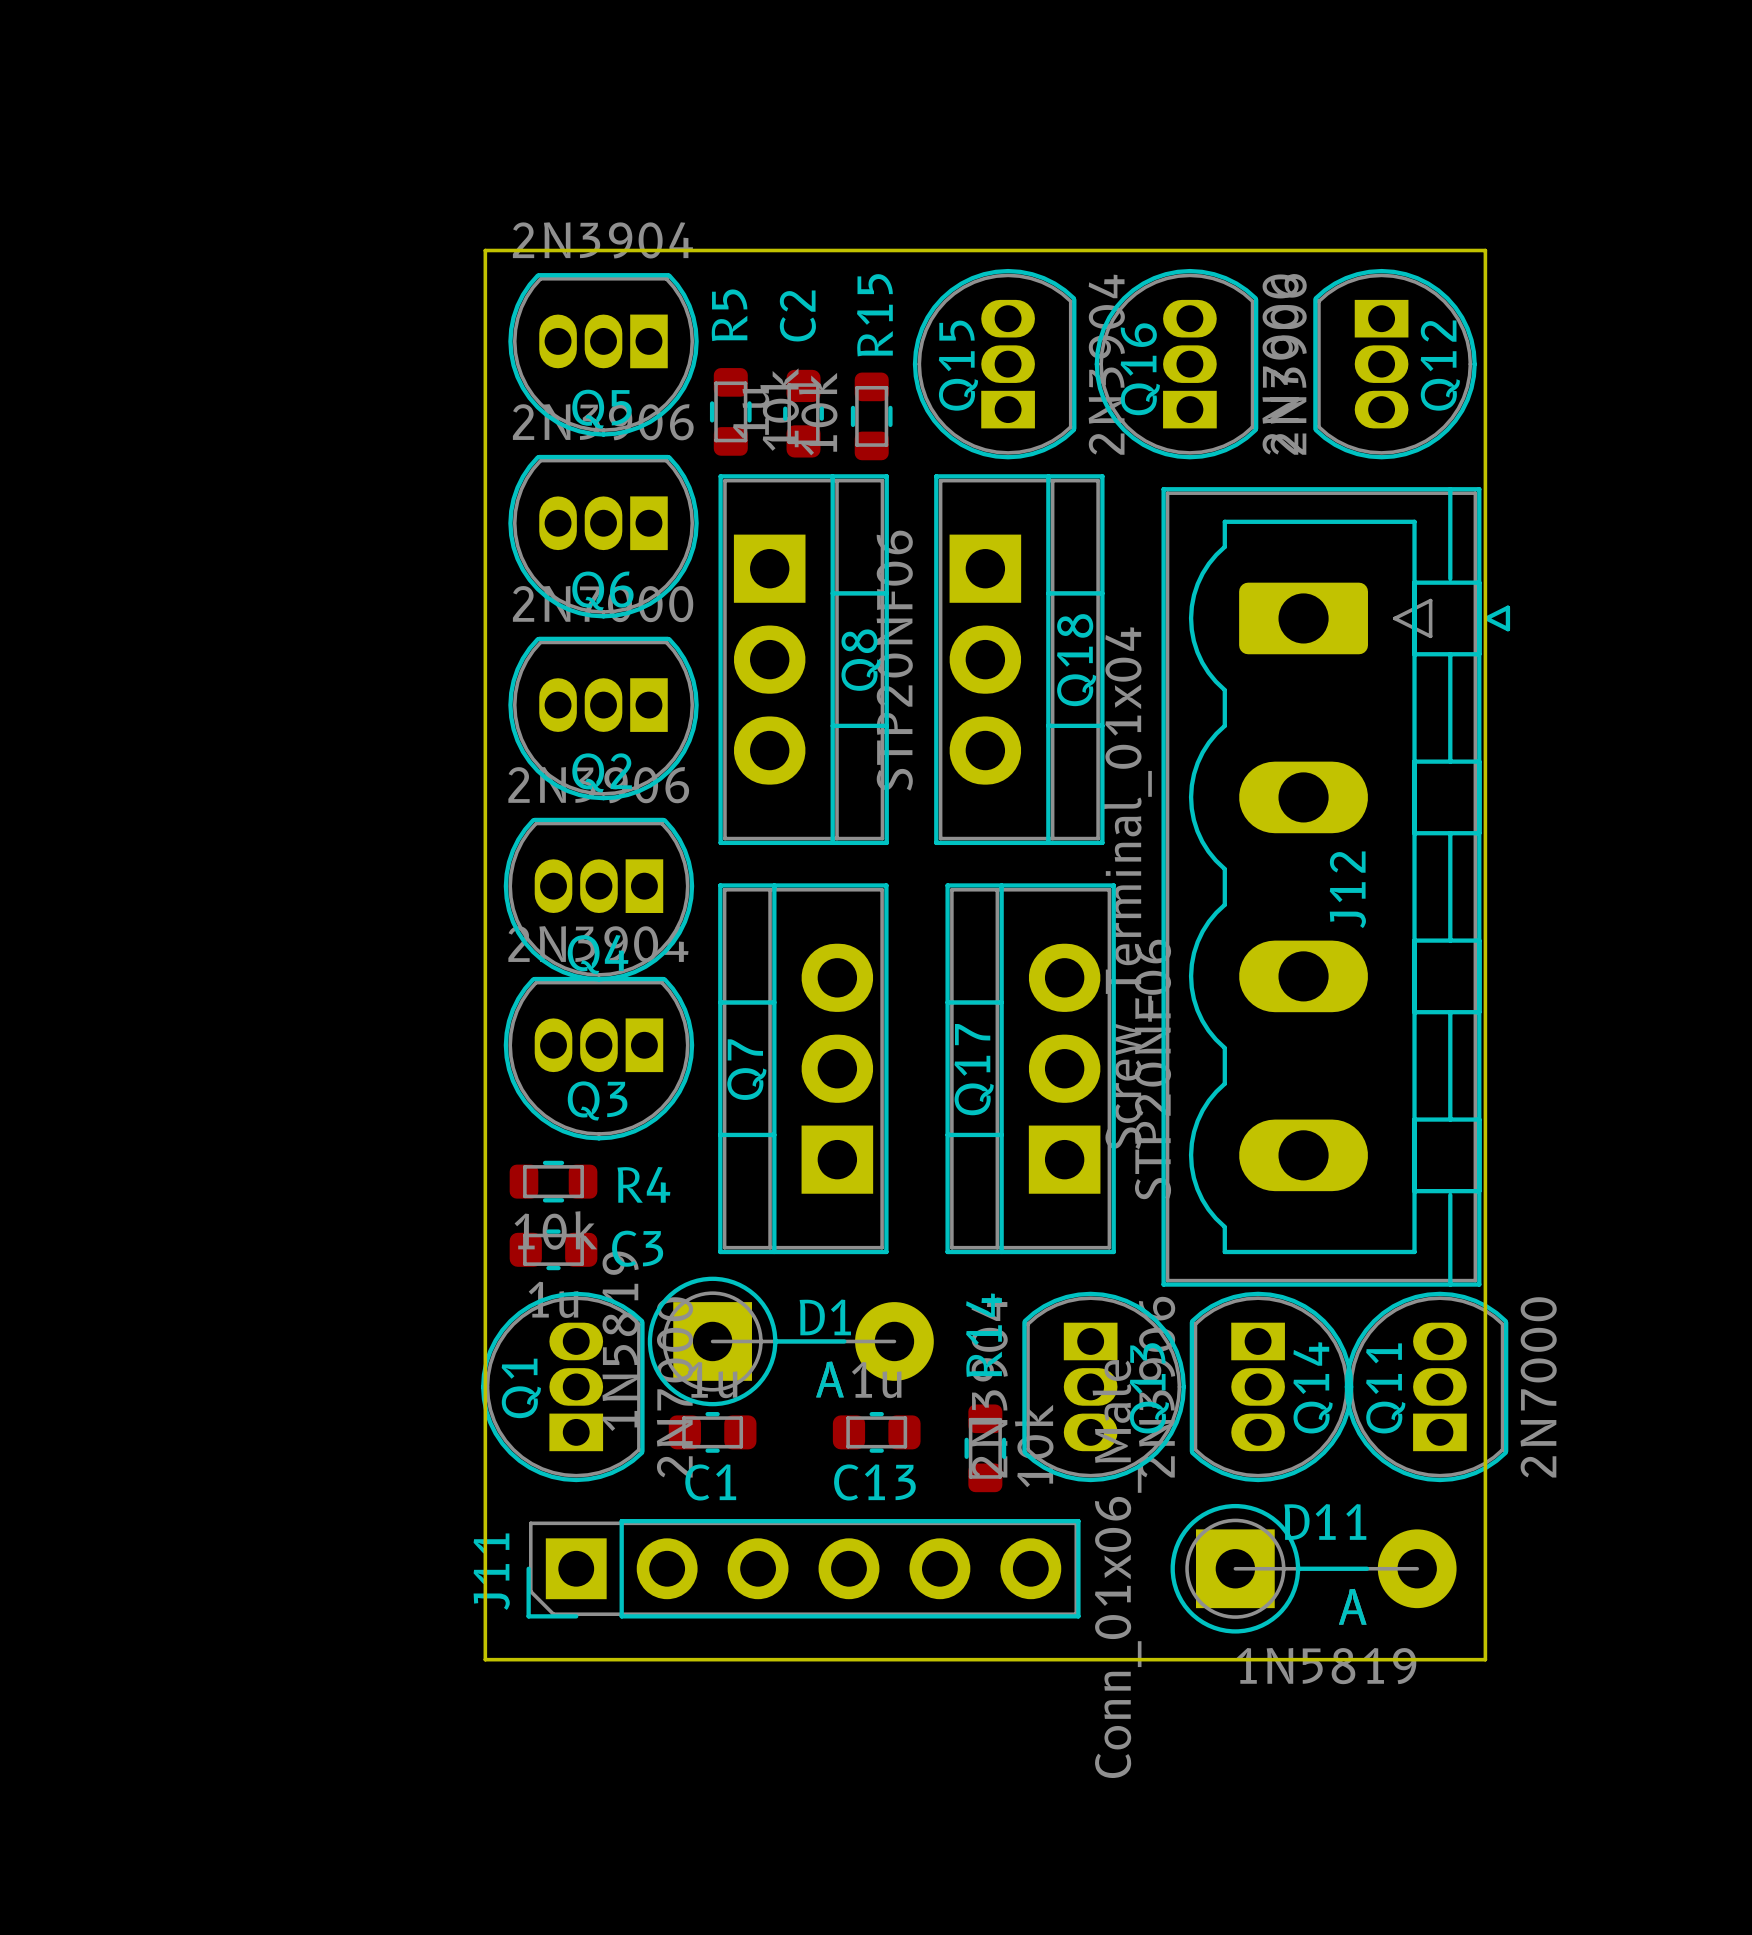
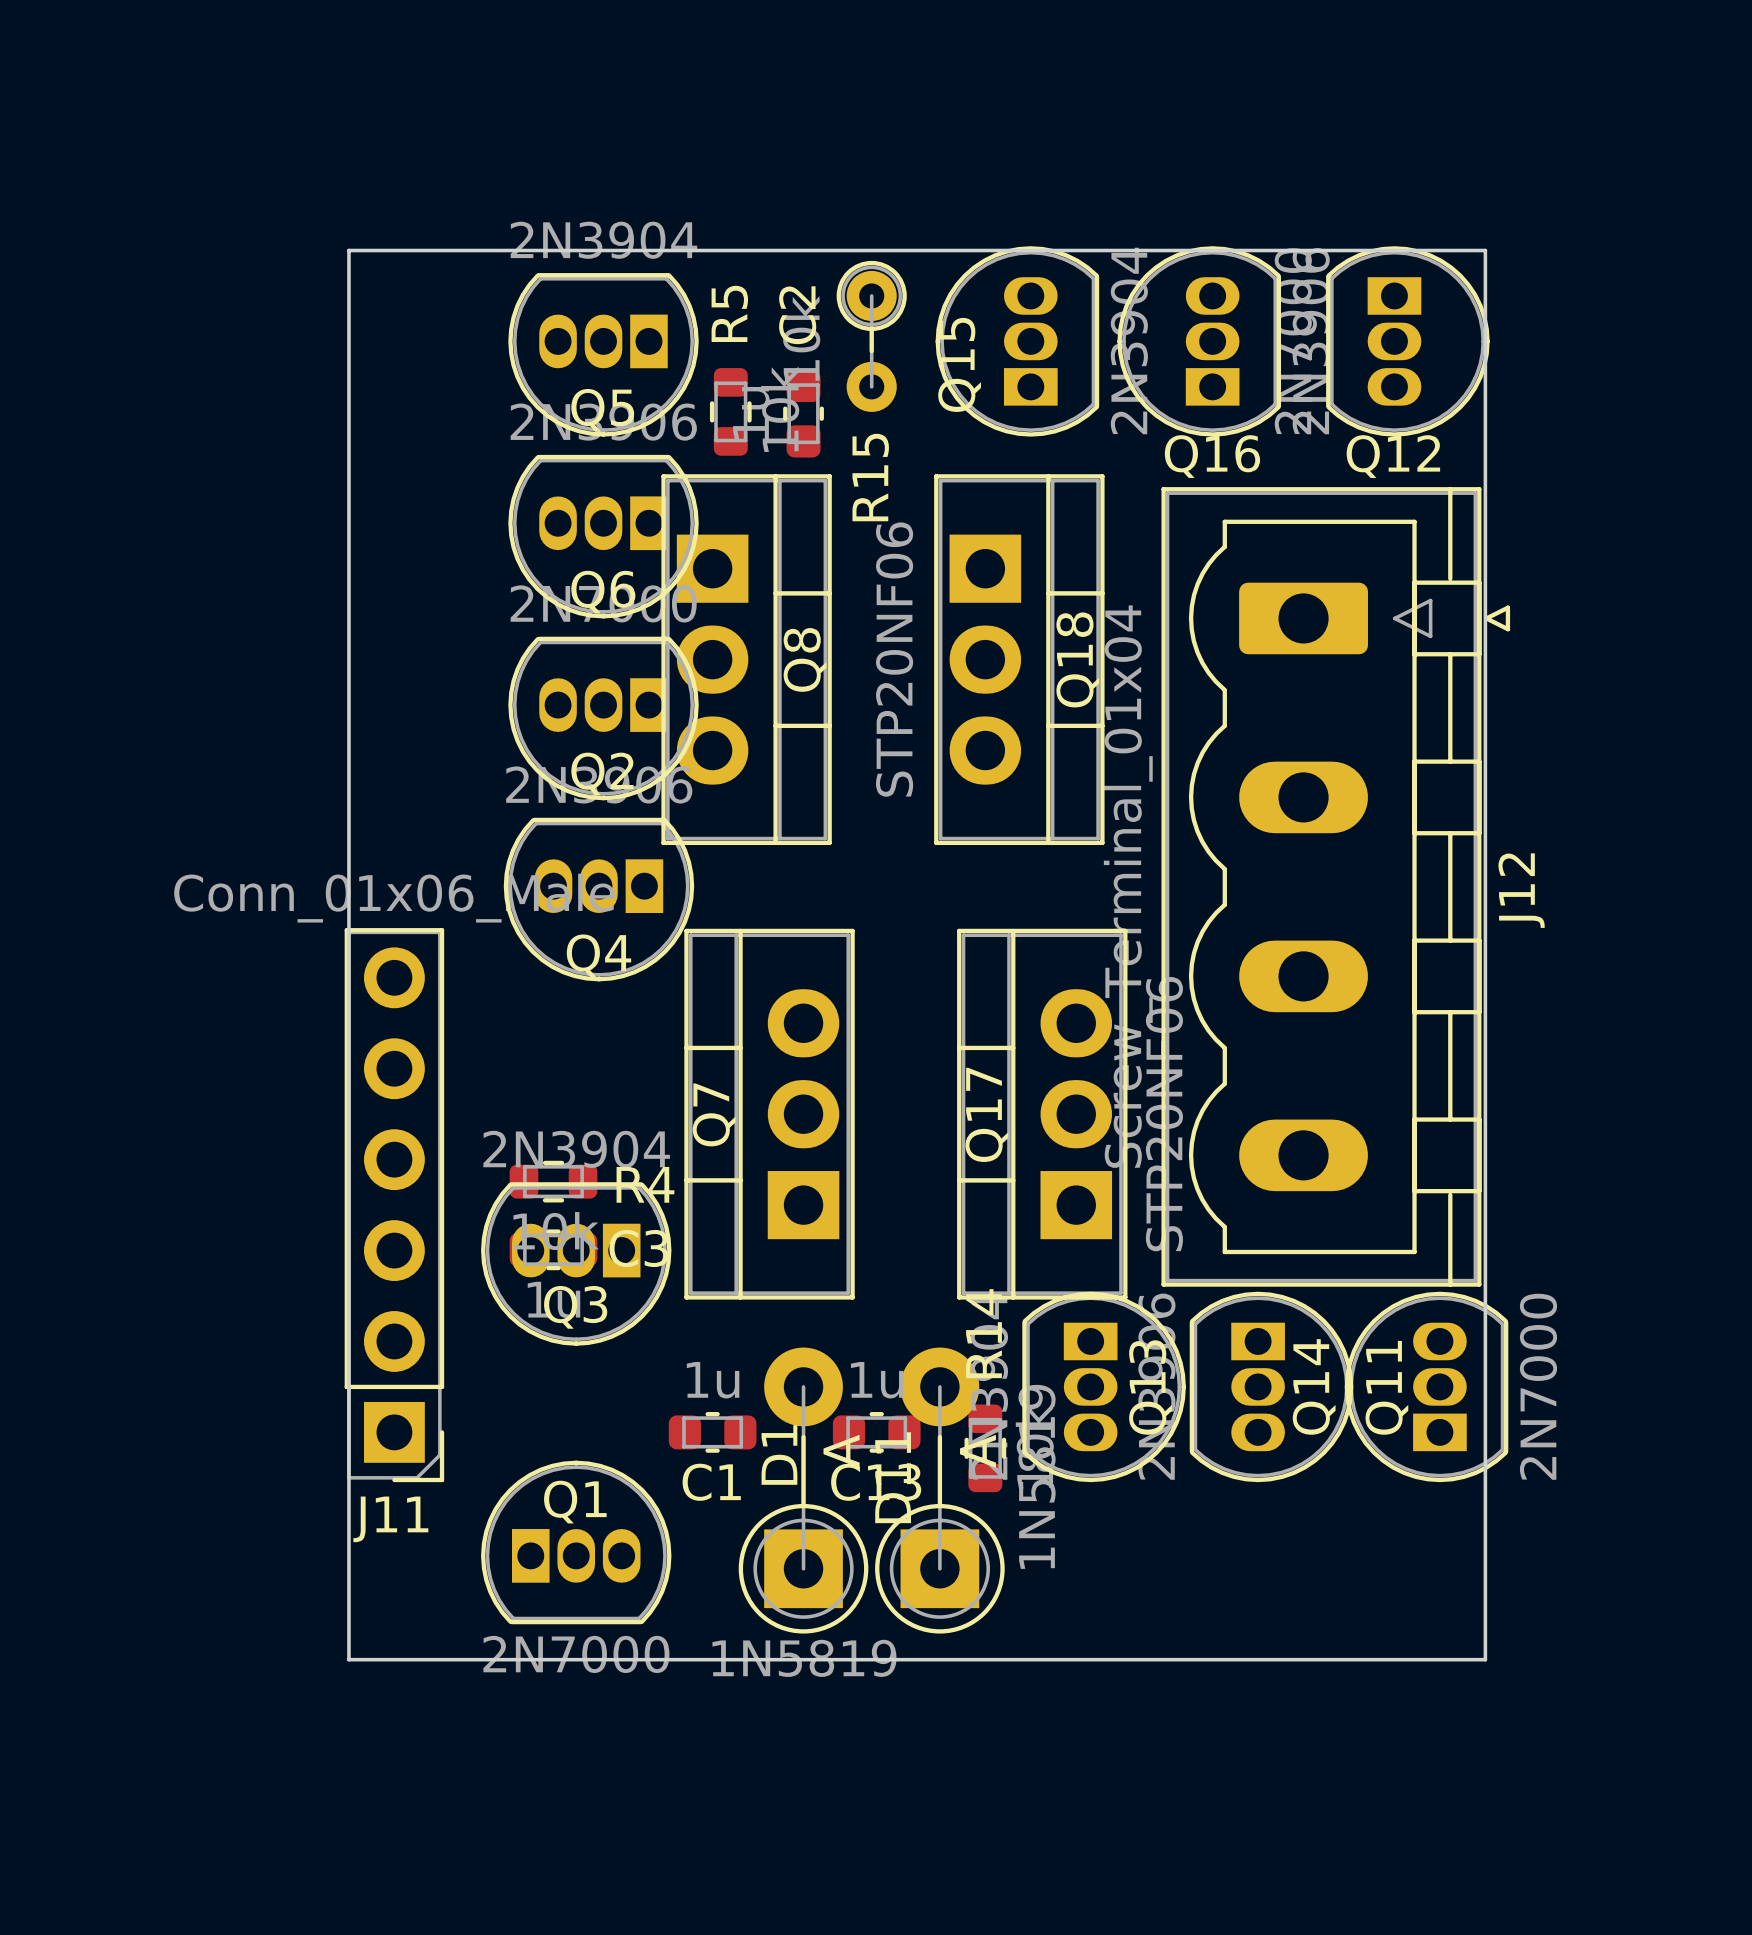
board edge: (485, 250) (485, 1659) -> (485, 250) (348, 250) (348, 1659) (485, 1659)
R15 name position: R15 (874, 315) -> R15 (870, 477)
Q15 position: (994, 364) -> (1017, 341)
Q16 position: (1176, 364) -> (1199, 341)
Q12 position: (1395, 364) -> (1407, 341)
Q12 name rotation: 0° (1440, 365) -> 90° clockwise (1393, 456)
Q16 name rotation: 0° (1140, 369) -> 90° clockwise (1212, 456)
R15 footprint: [850, 372, 893, 461] -> [836, 260, 907, 412]
Q8 position: (803, 659) -> (746, 659)
J12 name position: J12 (1347, 889) -> J12 (1521, 890)
Q3 position: (598, 1058) -> (576, 1263)
Q7 position: (803, 1068) -> (769, 1114)
Q17 position: (1030, 1068) -> (1042, 1114)
D1 rotation: 0° (790, 1341) -> 90° counterclockwise (803, 1490)
Q1 rotation: 0° (562, 1386) -> 90° clockwise (576, 1542)
Q1 position: (562, 1386) -> (576, 1542)
J11 rotation: 0° (803, 1568) -> 90° counterclockwise (394, 1205)
J11 position: (803, 1568) -> (394, 1205)
D11 rotation: 0° (1313, 1568) -> 90° counterclockwise (939, 1490)
D11 position: (1313, 1568) -> (939, 1490)

